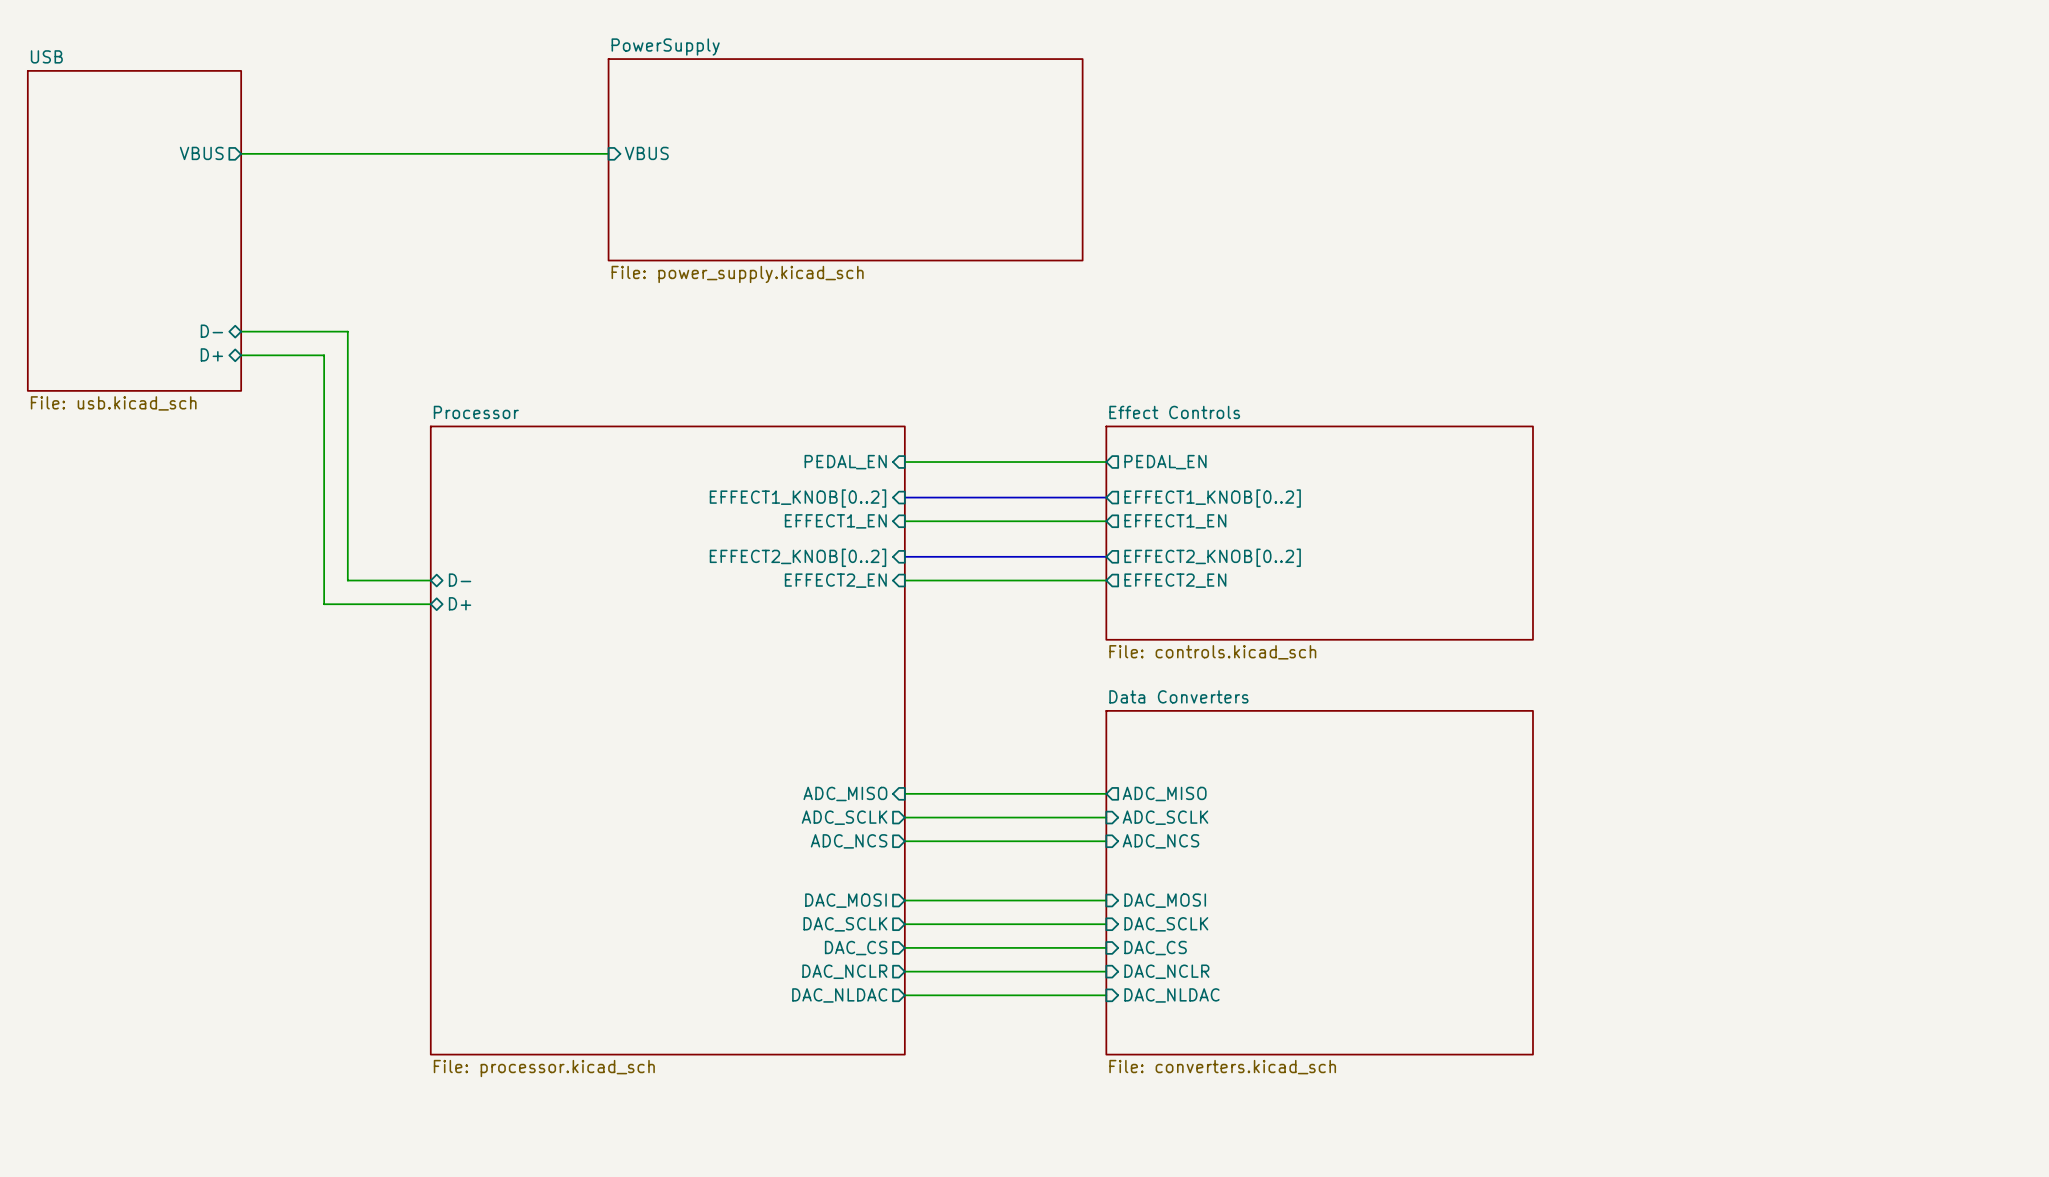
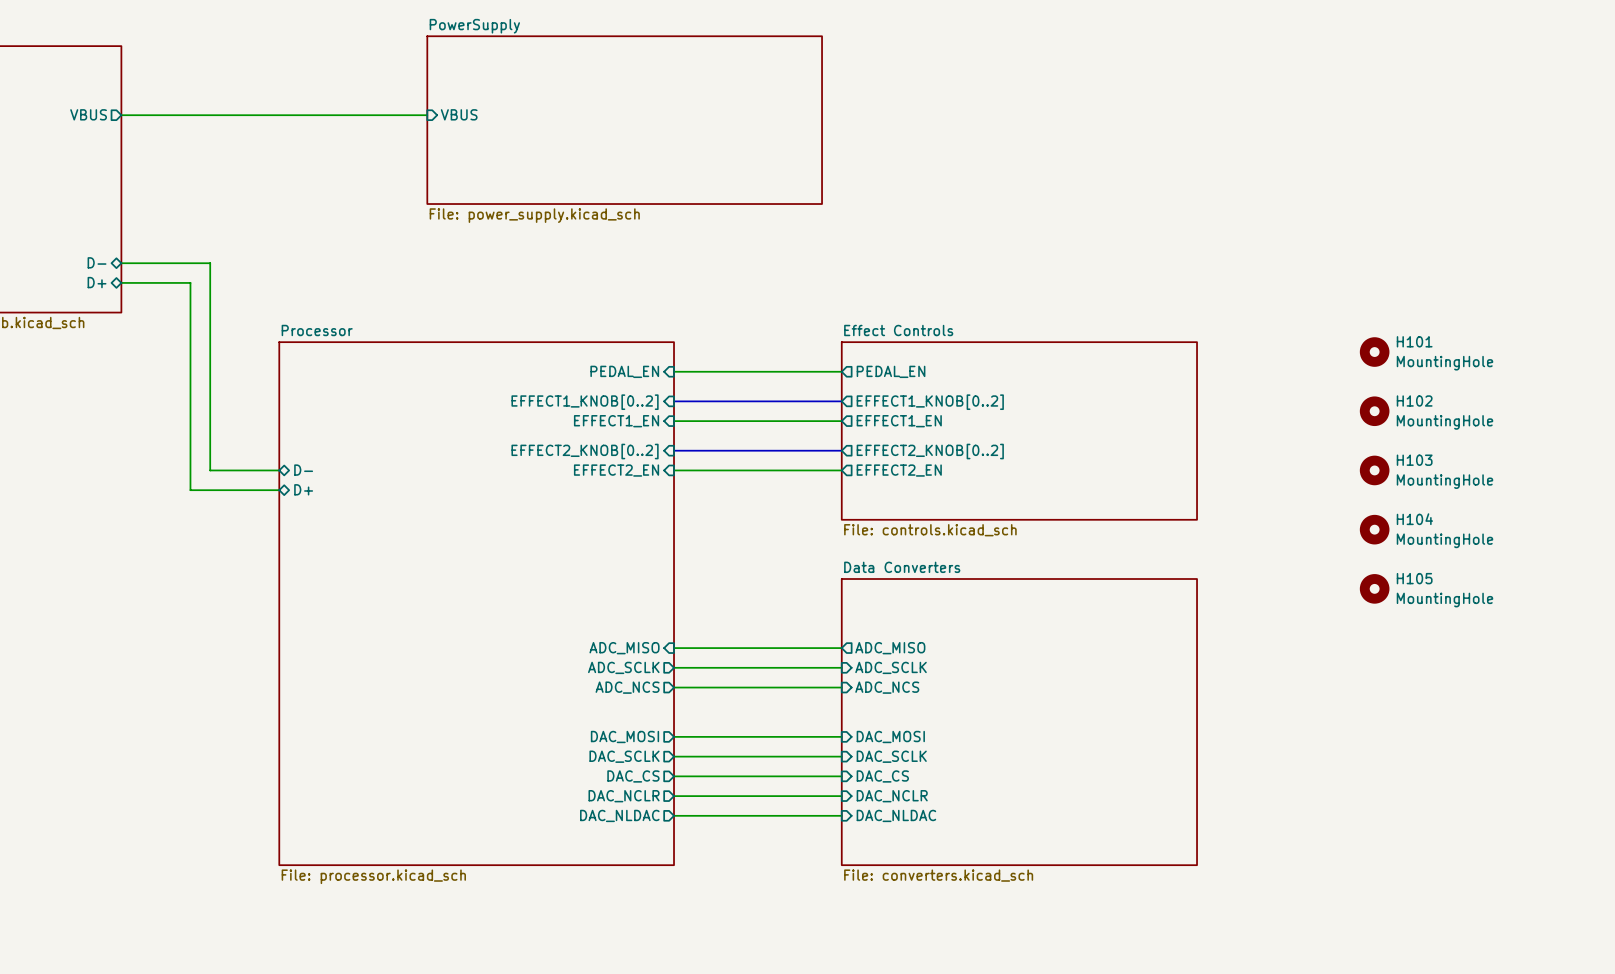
H101: none -> MountingHole (1374, 352)
H102: none -> MountingHole (1374, 411)
H103: none -> MountingHole (1374, 470)
H104: none -> MountingHole (1374, 529)
H105: none -> MountingHole (1374, 588)

